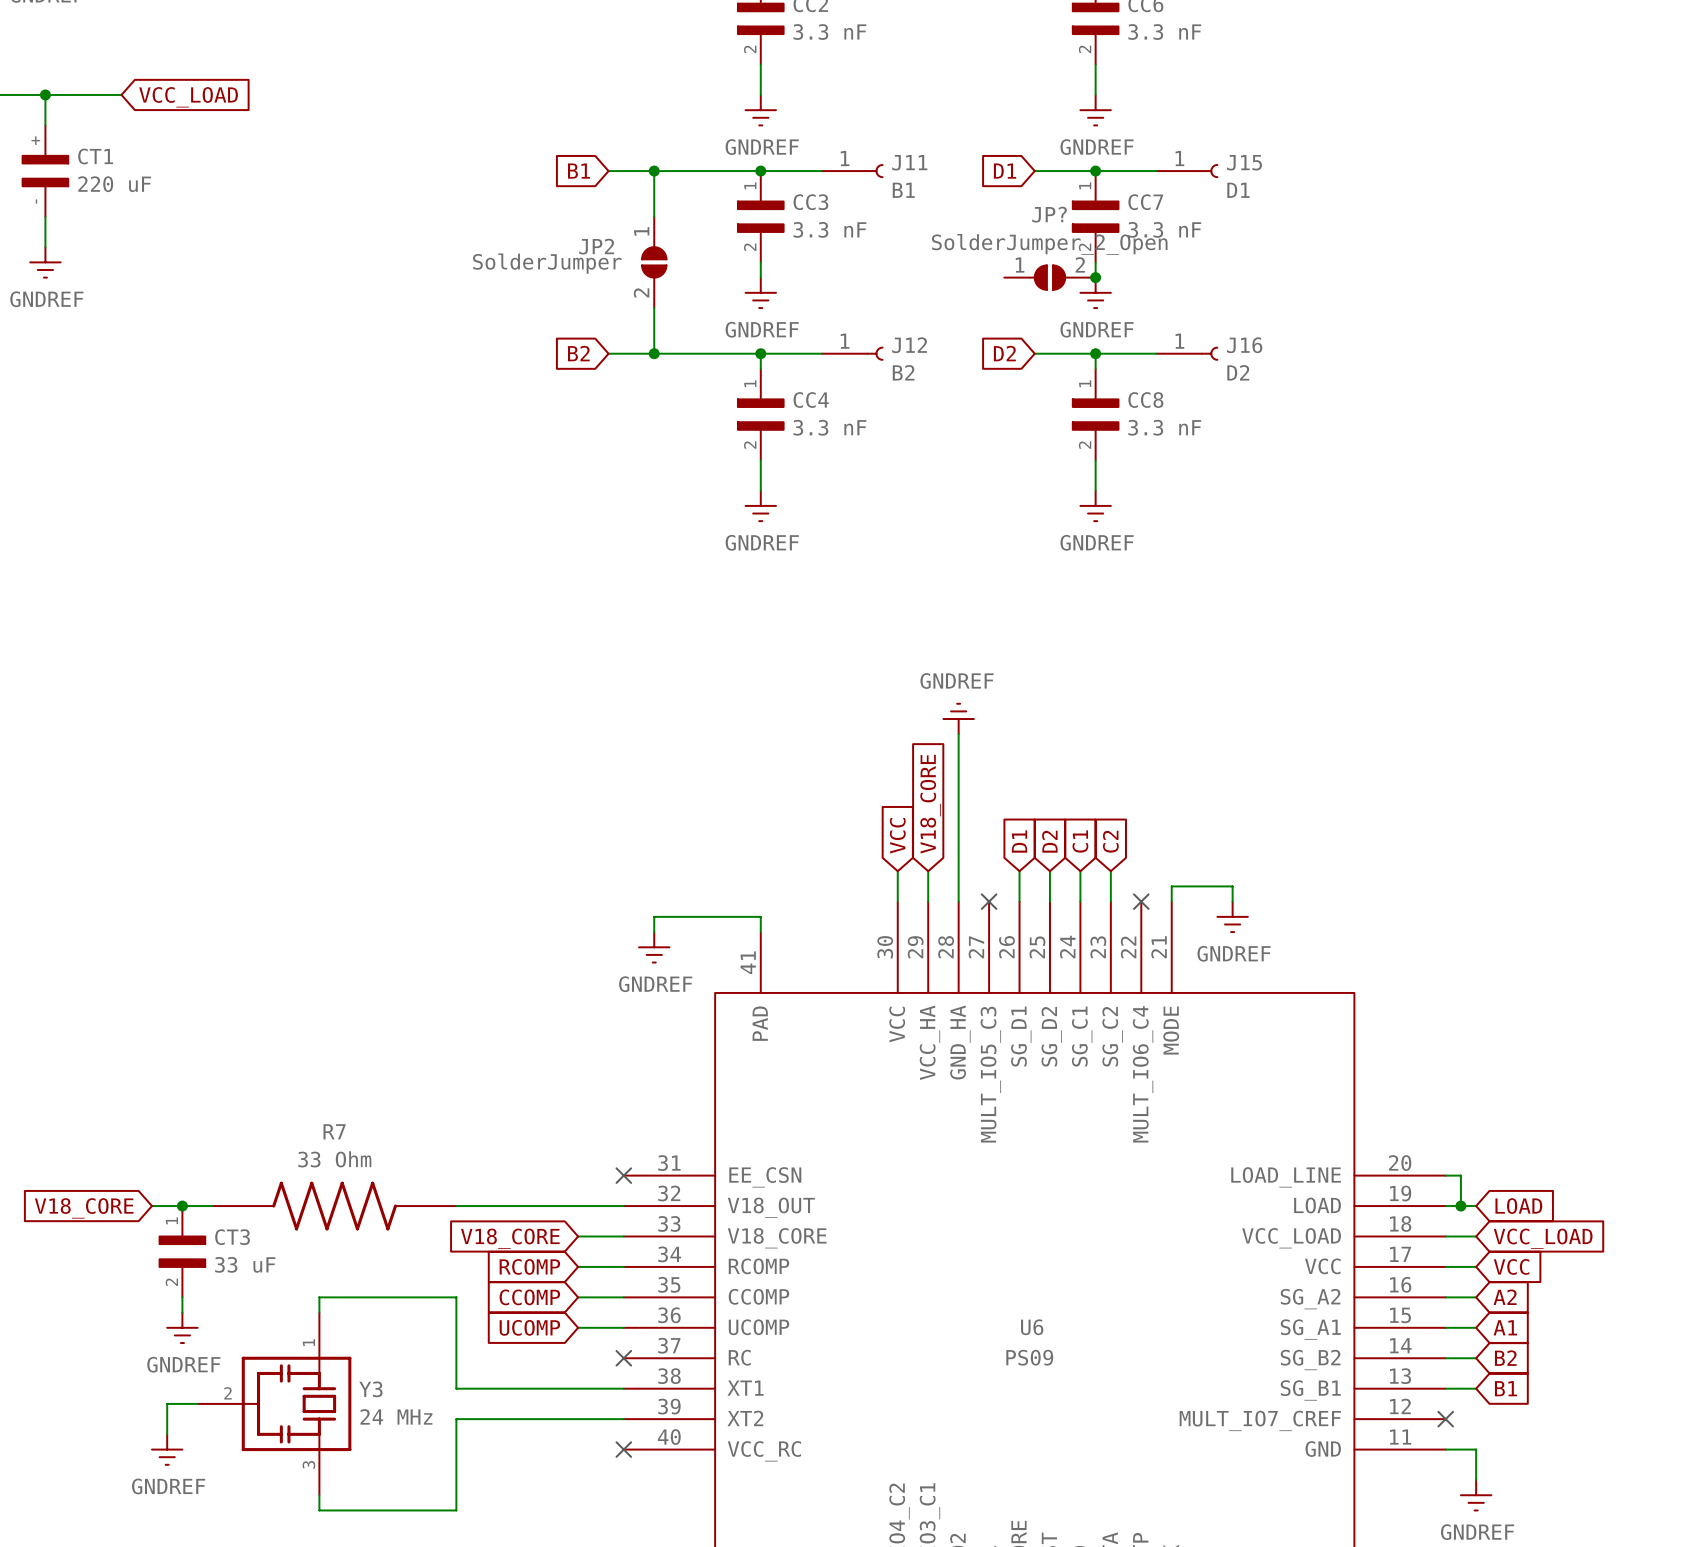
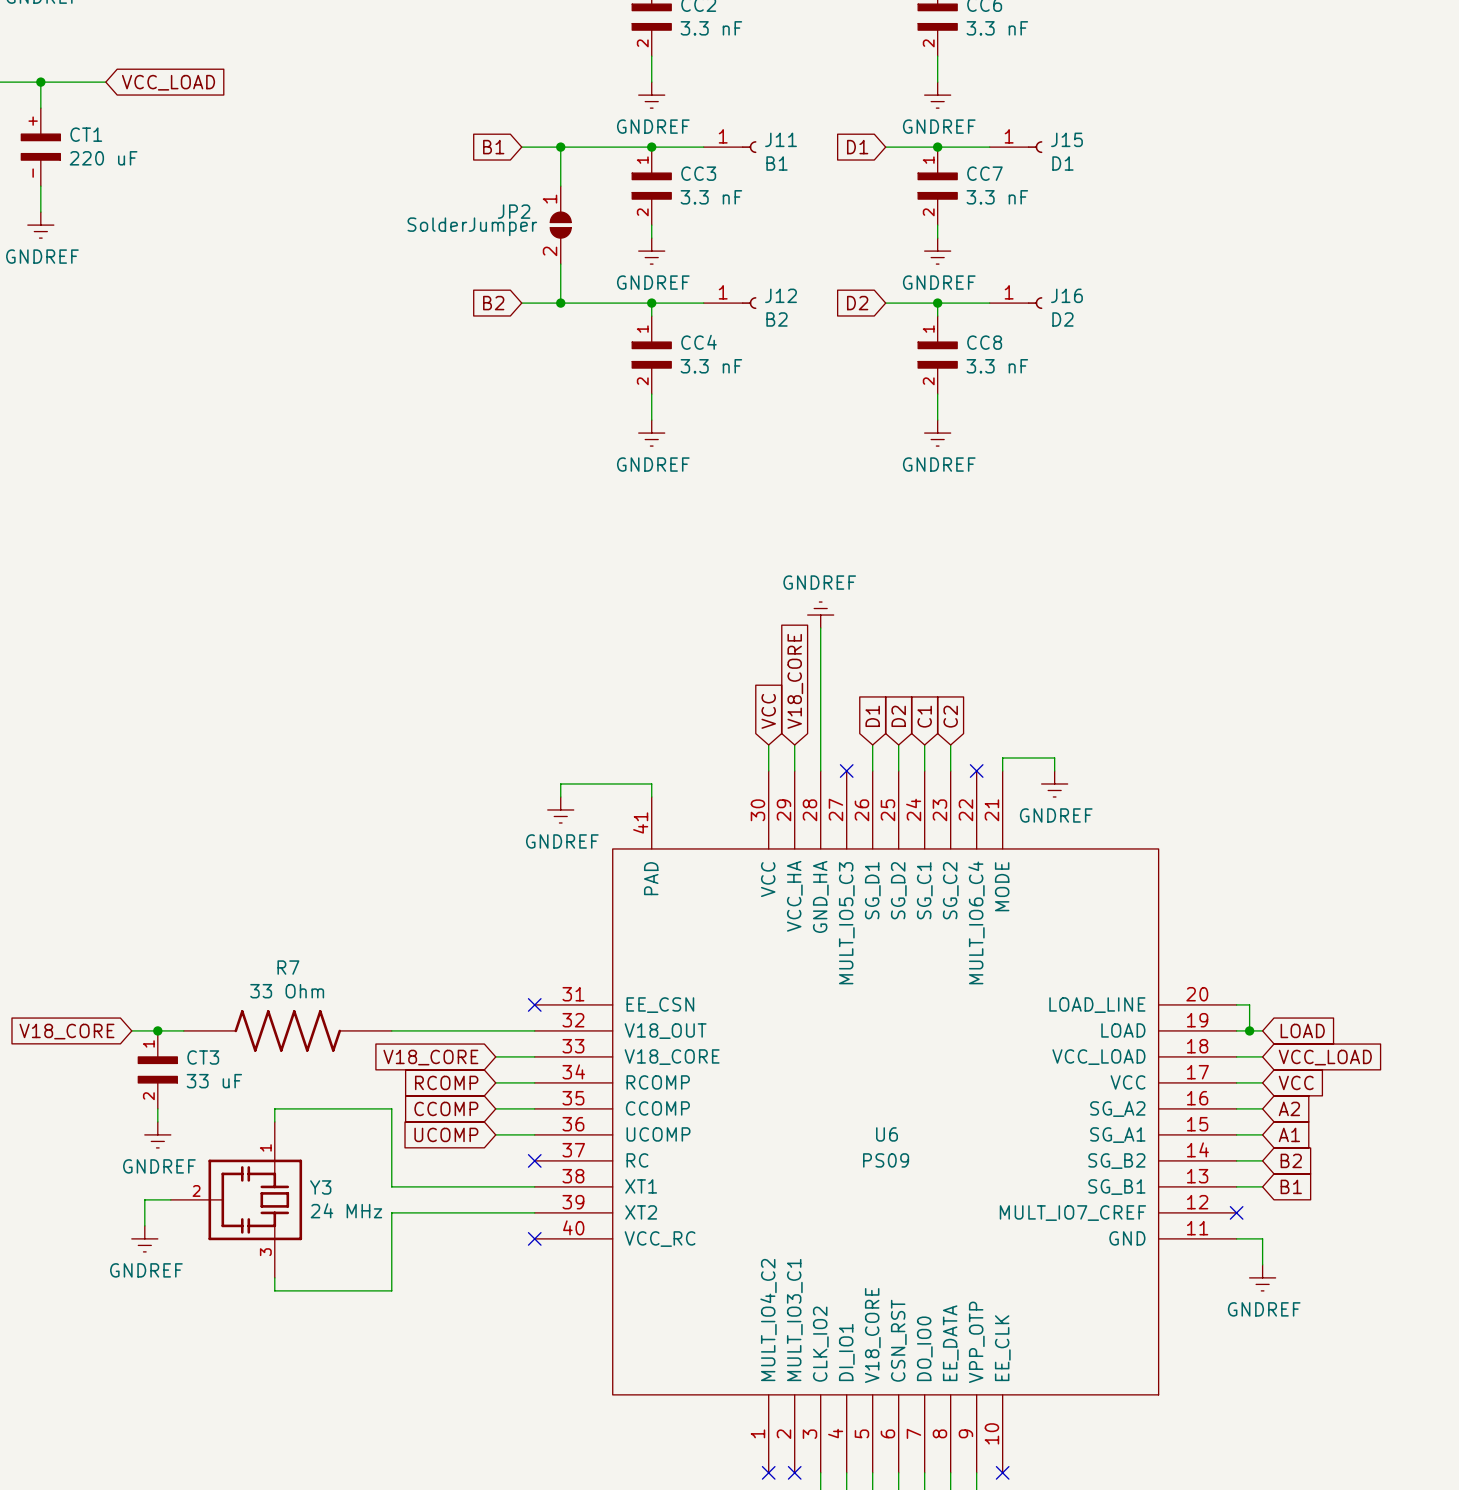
JP?: SolderJumper_2_Open (1049, 277) -> none
junction: (1095, 277) -> none

